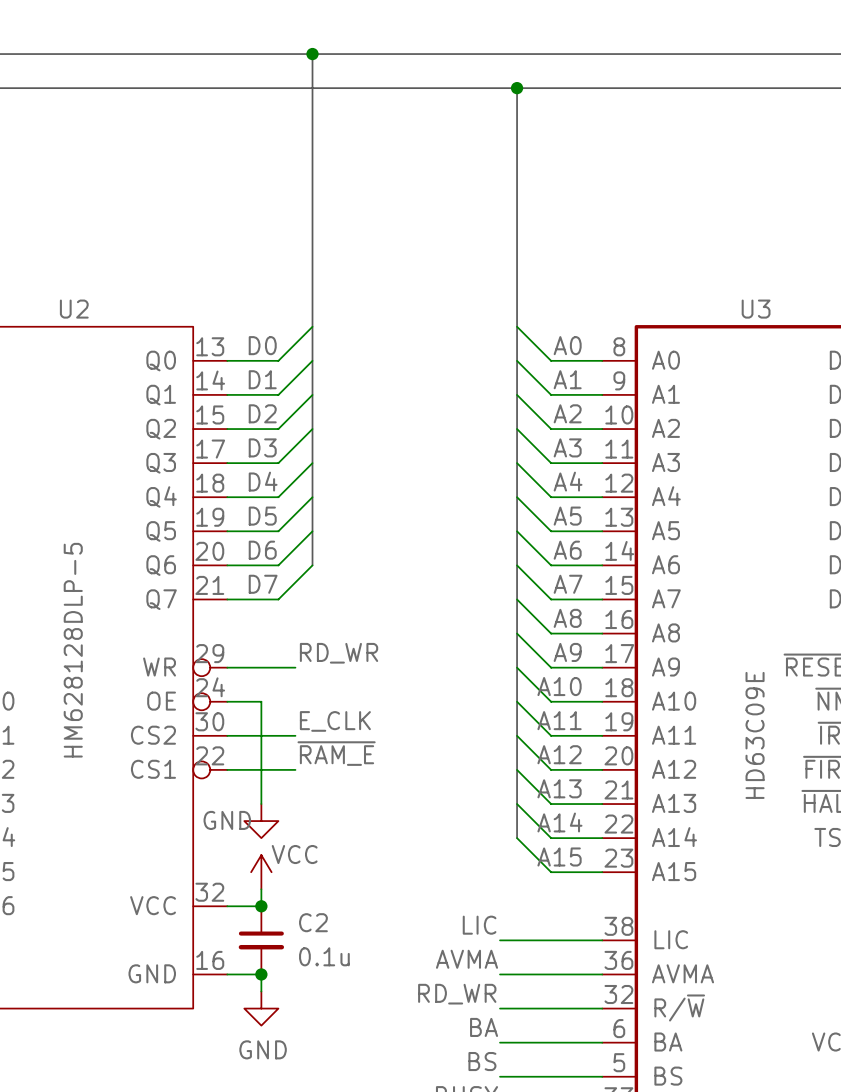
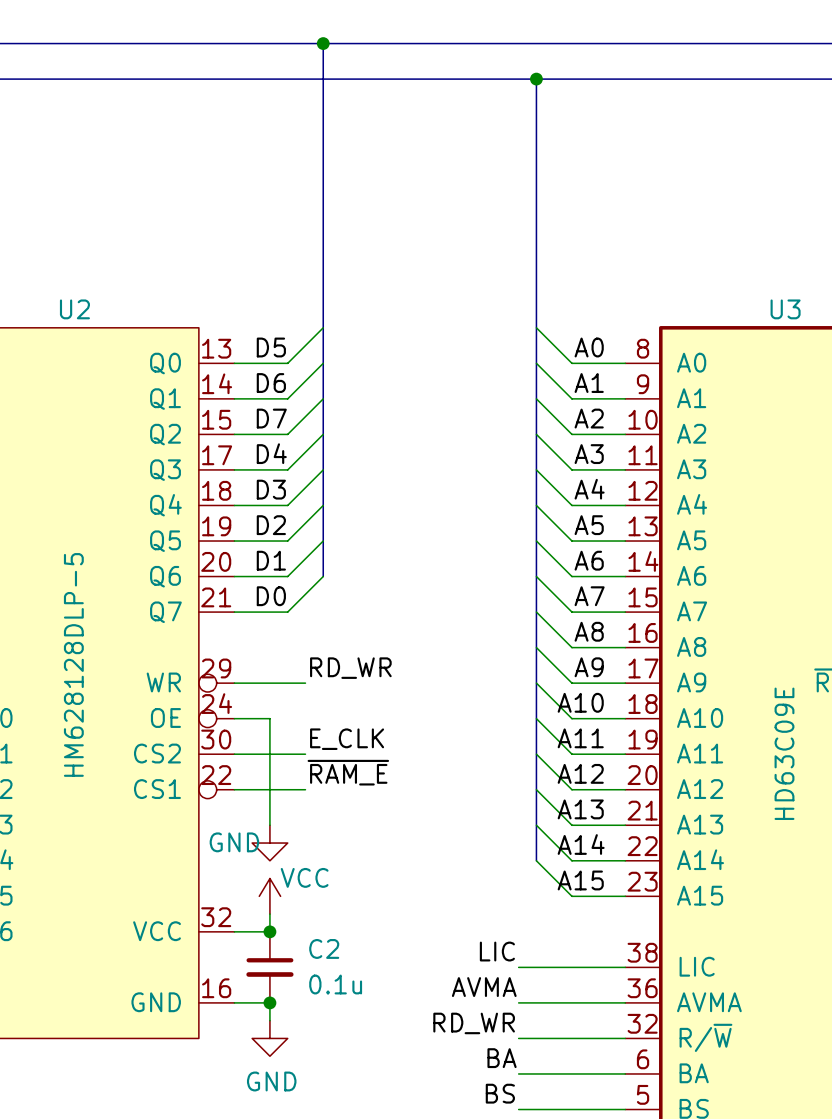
label: D0 (262, 345) -> D5 (271, 347)
label: D1 (262, 379) -> D6 (271, 383)
label: D2 (262, 413) -> D7 (271, 418)
label: D3 (262, 447) -> D4 (271, 453)
label: D4 (263, 481) -> D3 (271, 489)
label: D5 (262, 516) -> D2 (271, 525)
label: D6 (262, 550) -> D1 (271, 560)
label: D7 (263, 584) -> D0 (271, 596)

